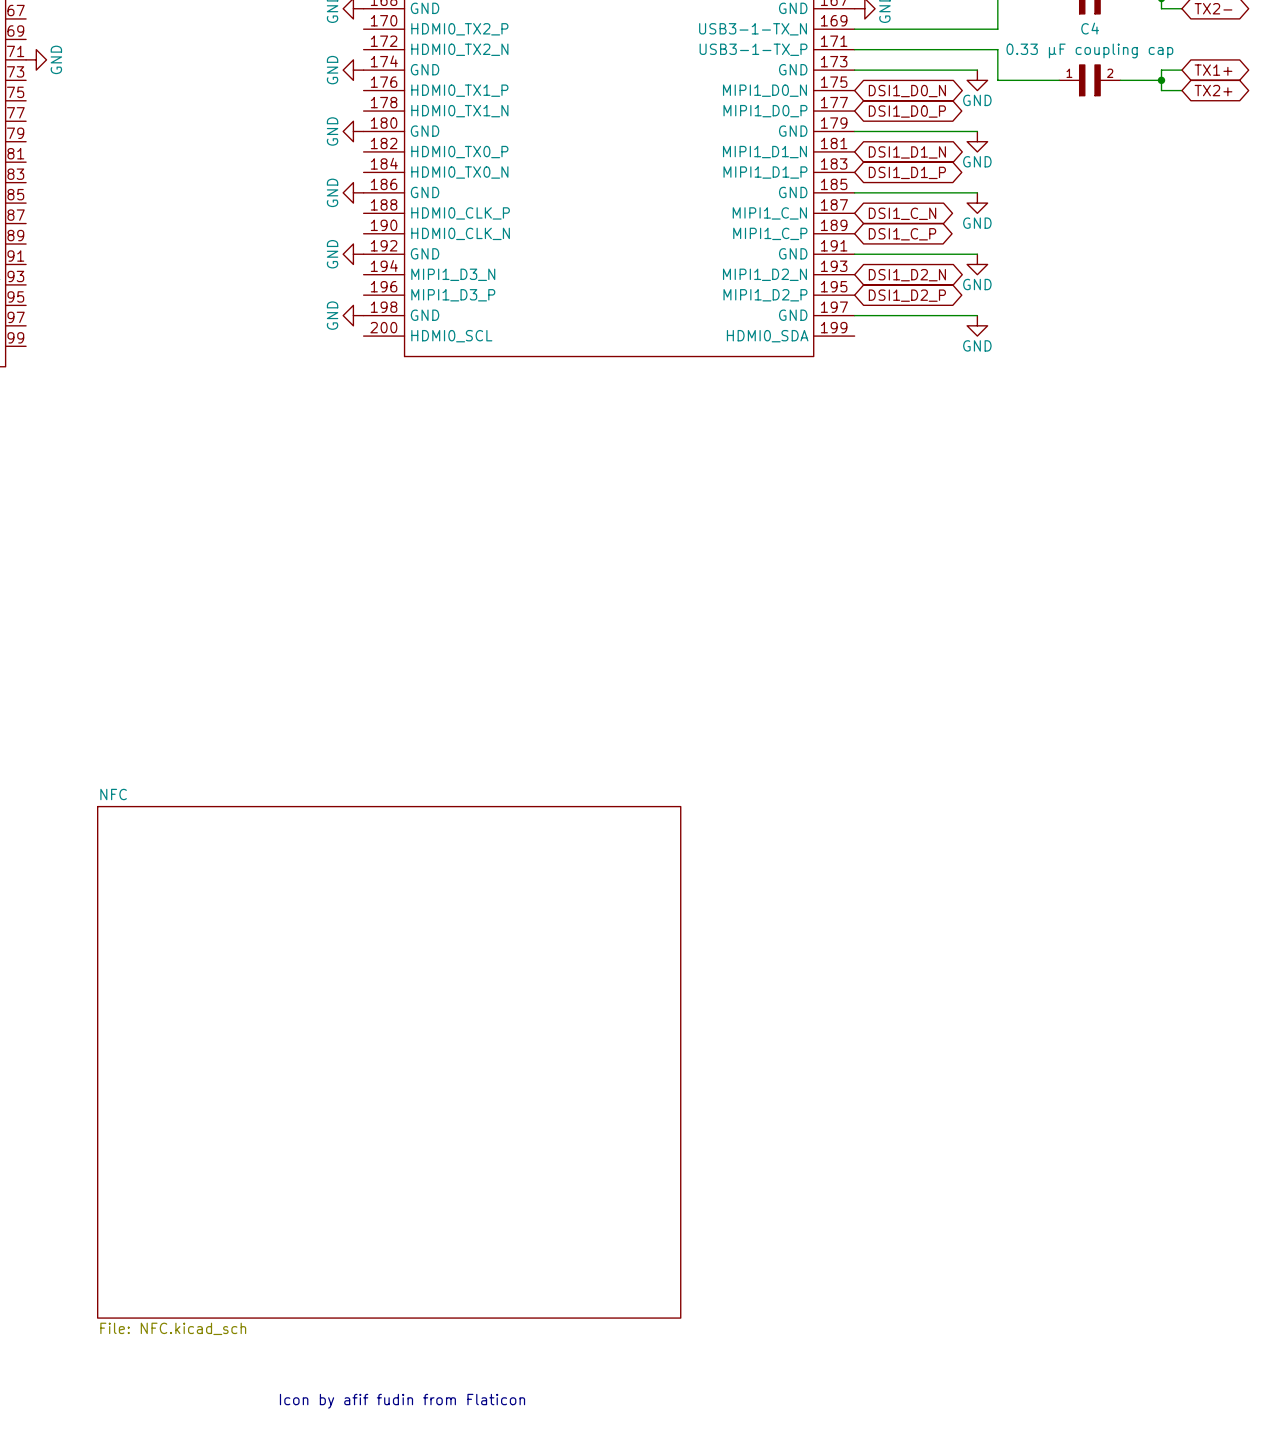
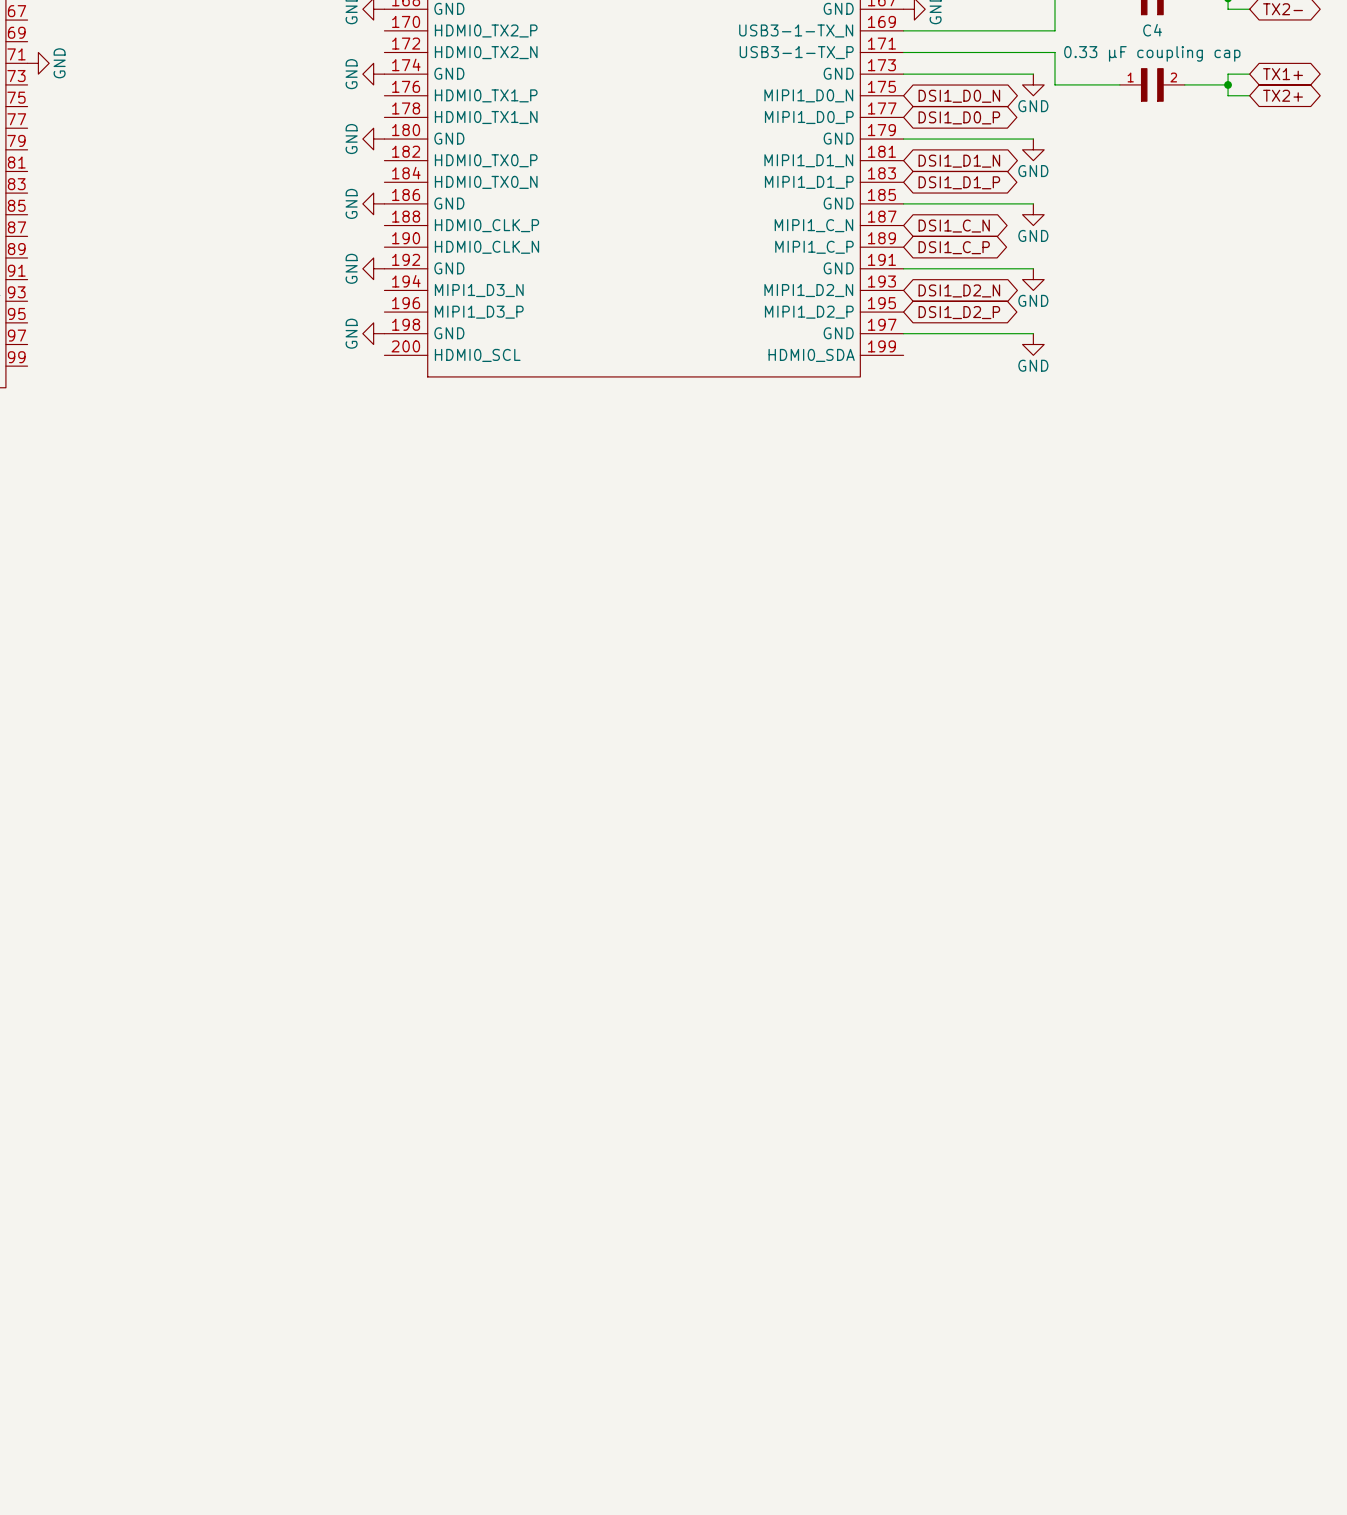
sheet NFC: File: NFC.kicad_sch (389, 1062) -> none
text: Icon by afif fudin from Flaticon (402, 1401) -> none

